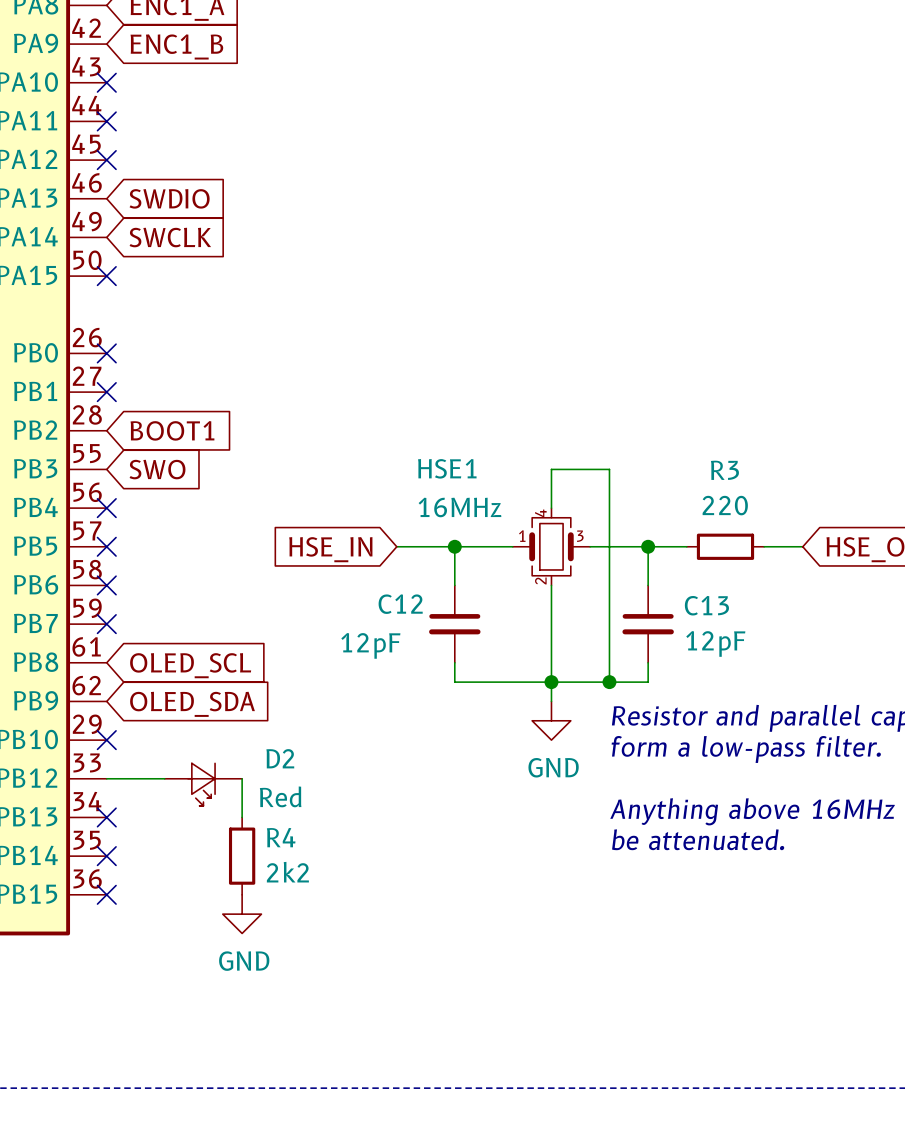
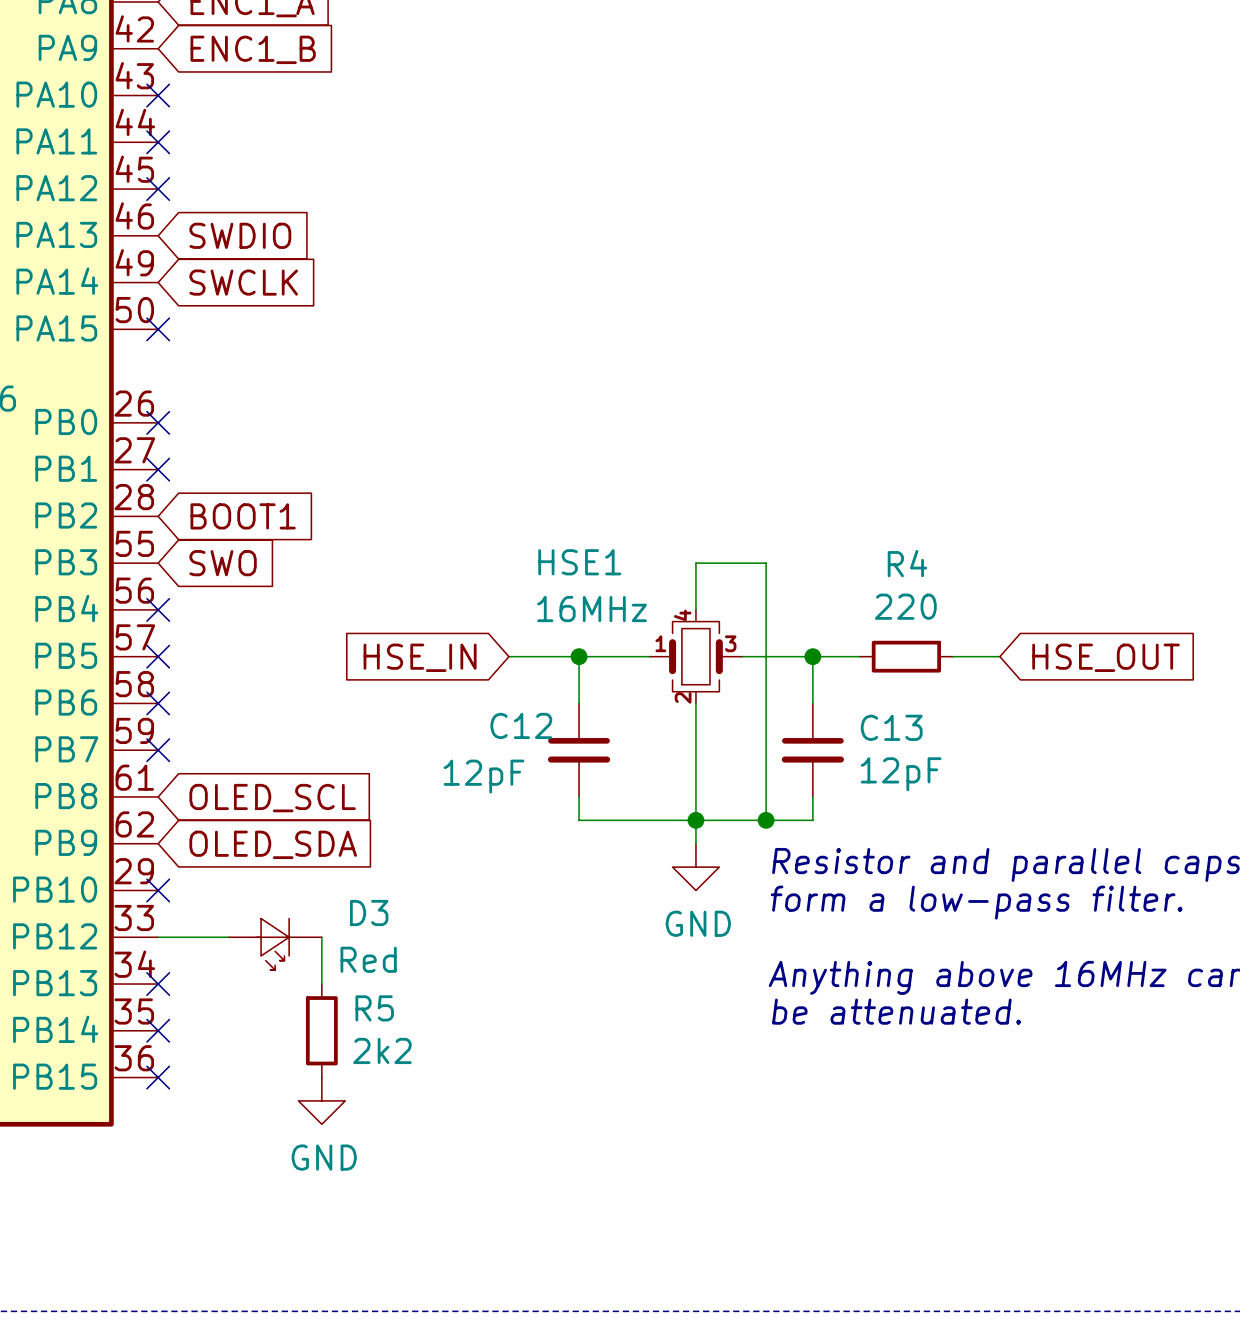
R3 name: R3 (724, 470) -> R4 (907, 563)
D2 name: D2 (280, 758) -> D3 (369, 913)
R4 name: R4 (281, 837) -> R5 (374, 1008)

